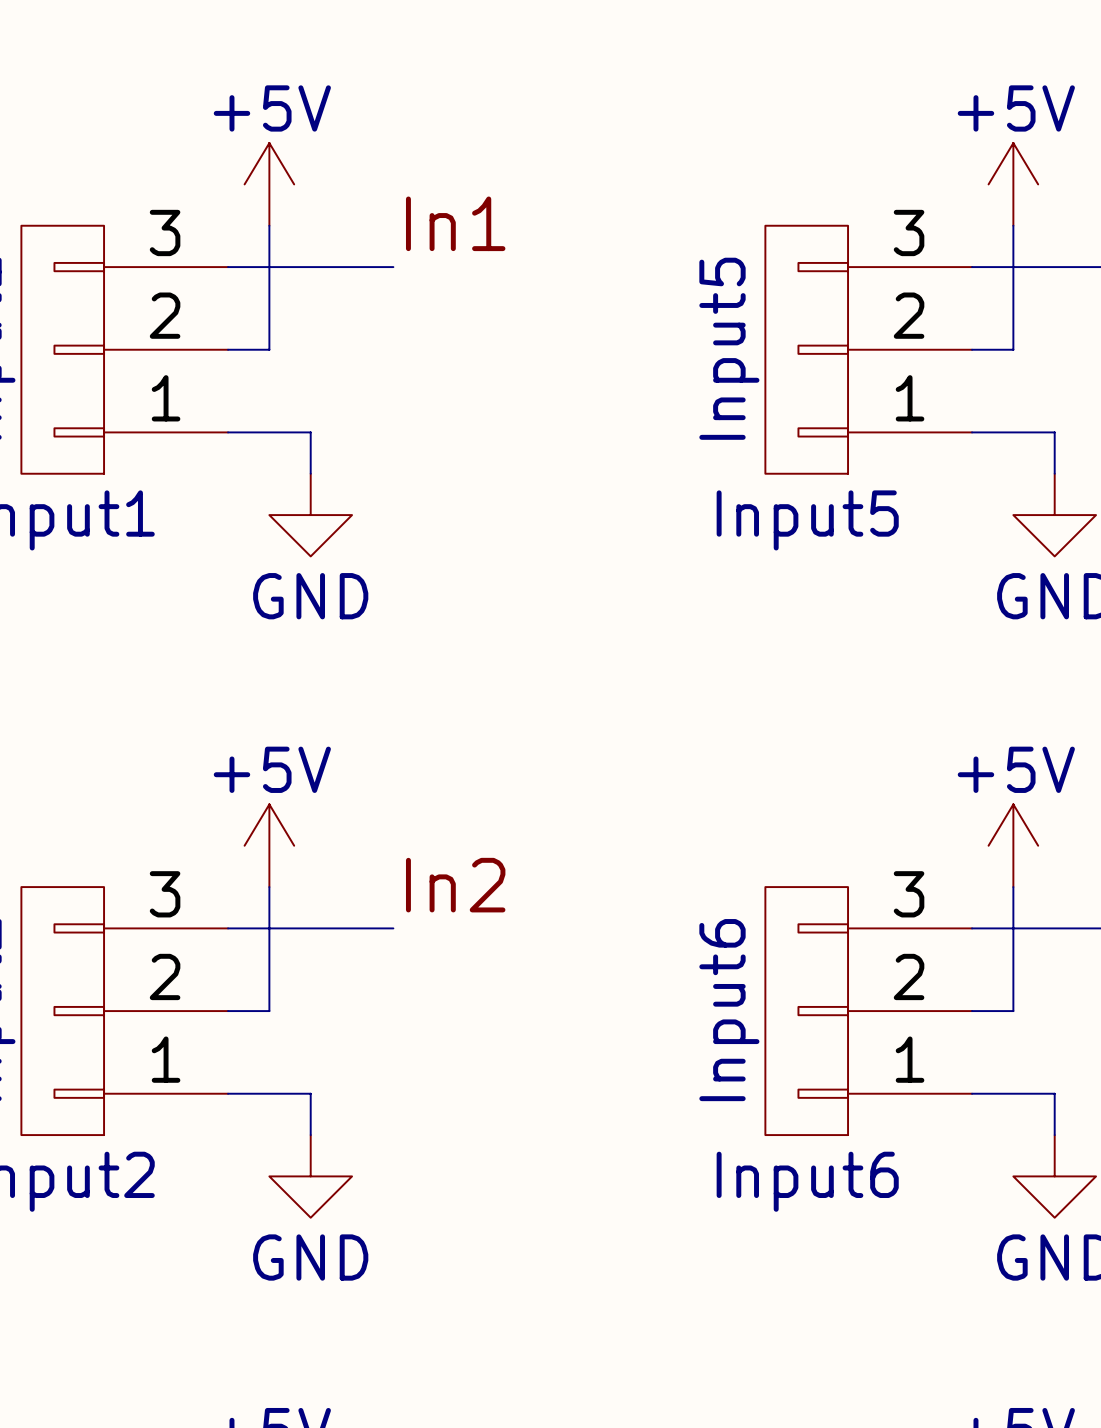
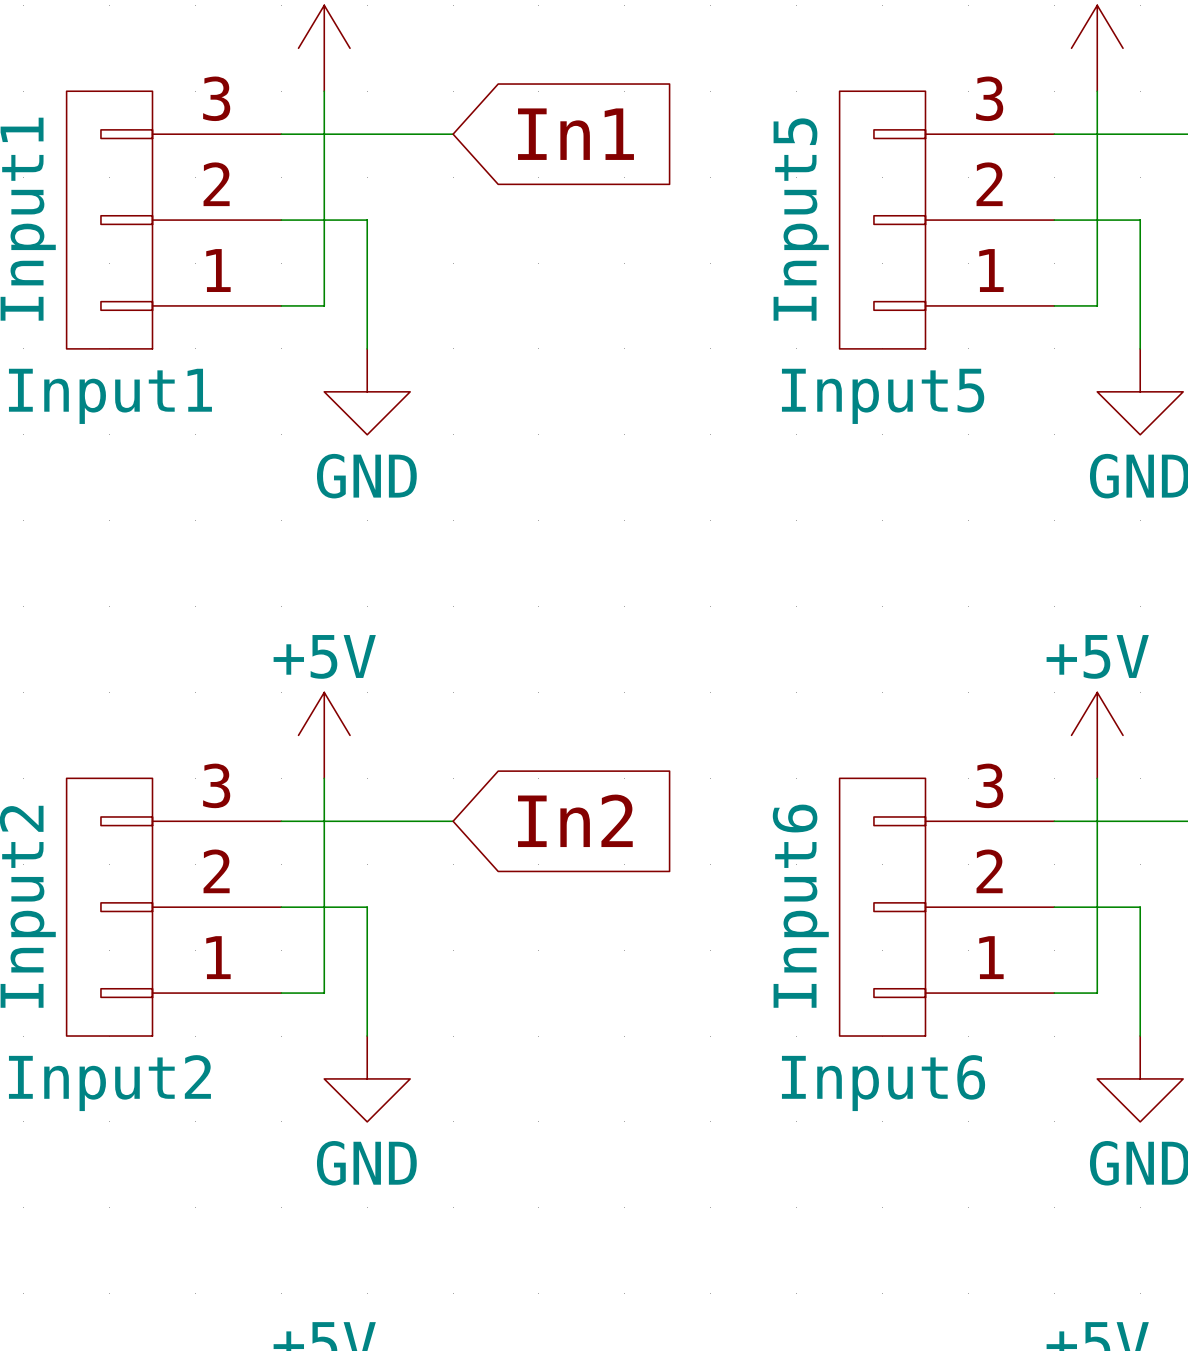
label: In1 (455, 223) -> none
global label: none -> In1 (575, 134)
wire: (269, 432) (310, 432) -> (324, 305) (324, 220) (367, 220) (367, 305)
wire: (1013, 432) (1054, 432) -> (1097, 305) (1097, 220) (1140, 220) (1140, 305)
label: In2 (455, 885) -> none
global label: none -> In2 (575, 820)
wire: (269, 1093) (310, 1093) -> (324, 993) (324, 907) (367, 907) (367, 993)
wire: (1013, 1093) (1054, 1093) -> (1097, 993) (1097, 907) (1140, 907) (1140, 993)

